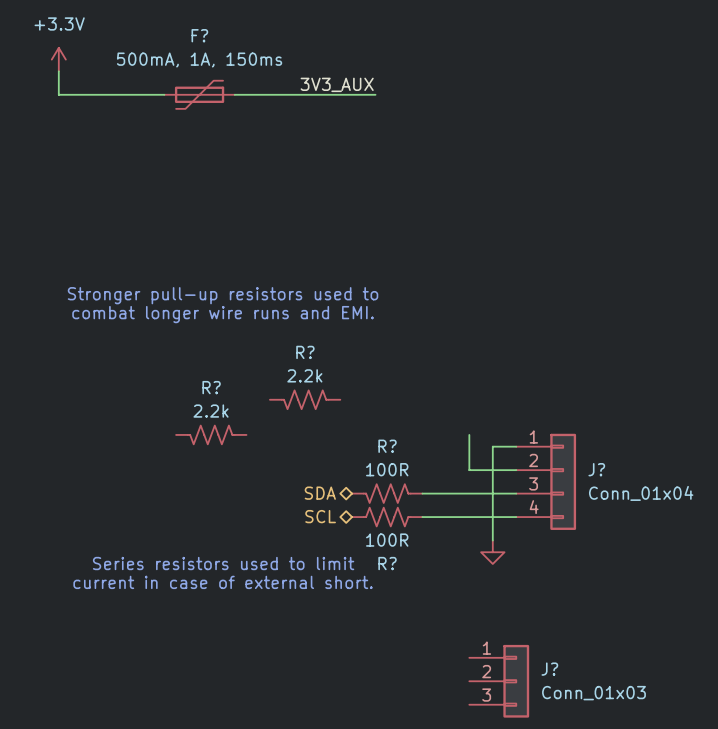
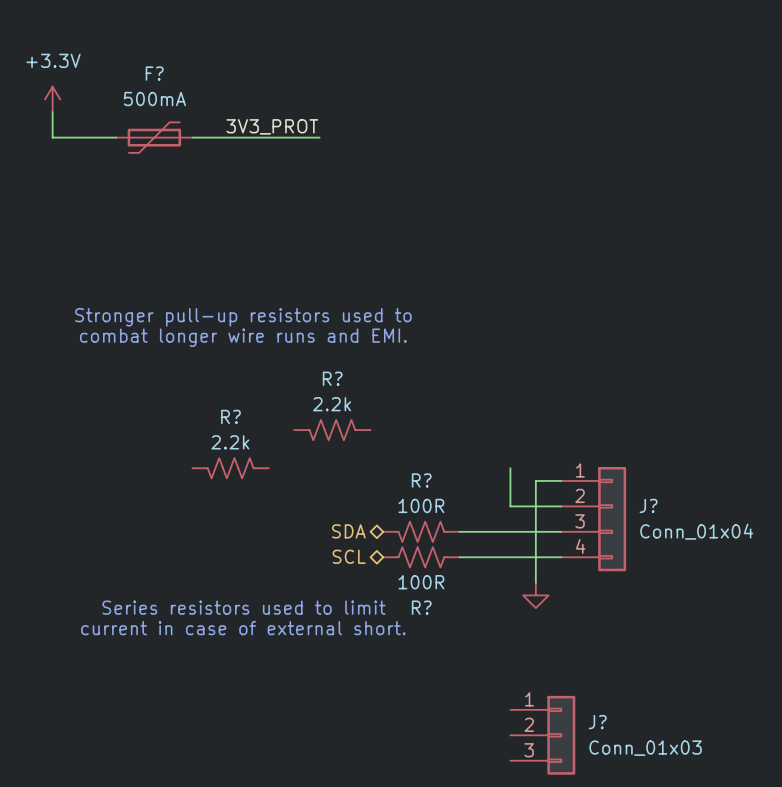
power symbol position: +3.3V (58, 59) -> +3.3V (52, 99)
wire: (58, 71) (58, 94) (164, 94) -> none
label: 3V3_AUX (337, 84) -> none
F?: 500mA, 1A, 150ms (199, 94) -> none
wire: (234, 94) (375, 94) -> none
wire: none -> (52, 112) (52, 137) (116, 137)
label: none -> 3V3_PROT (272, 126)
F?: none -> 500mA (154, 137)
wire: none -> (192, 137) (319, 137)

